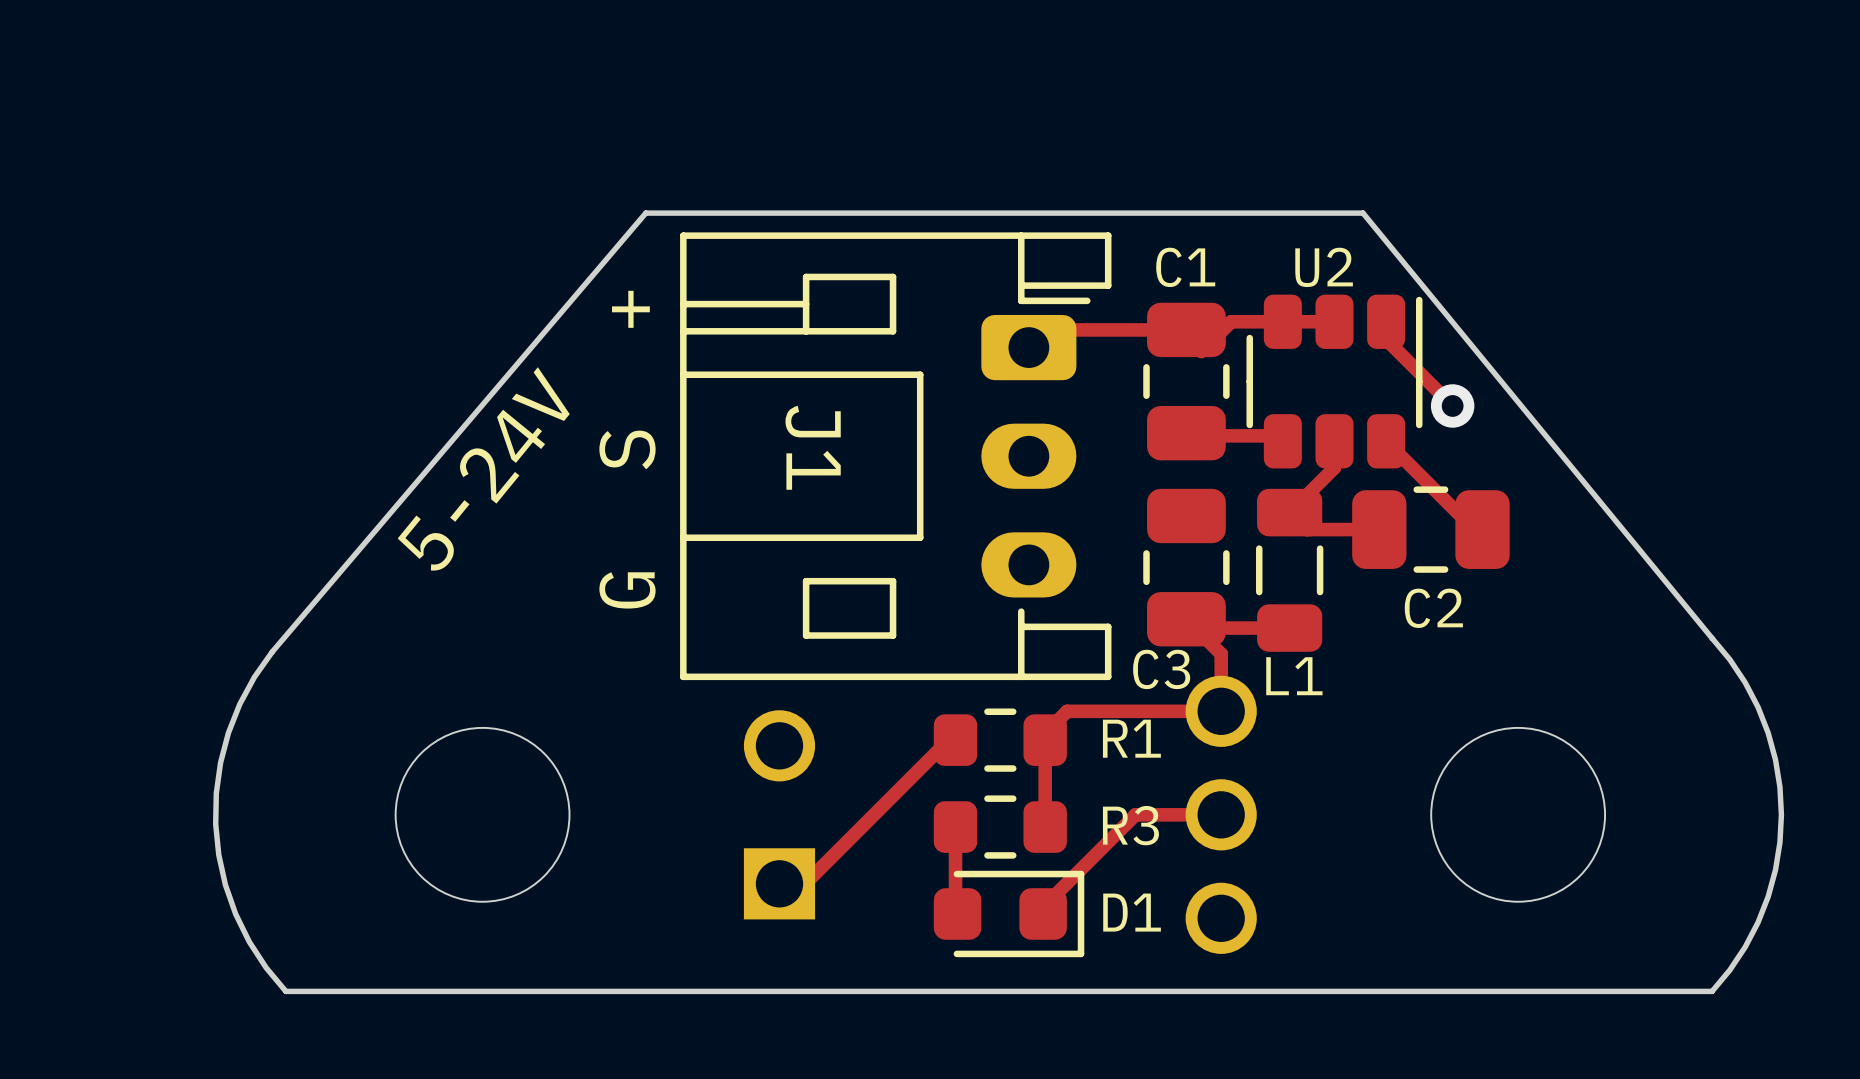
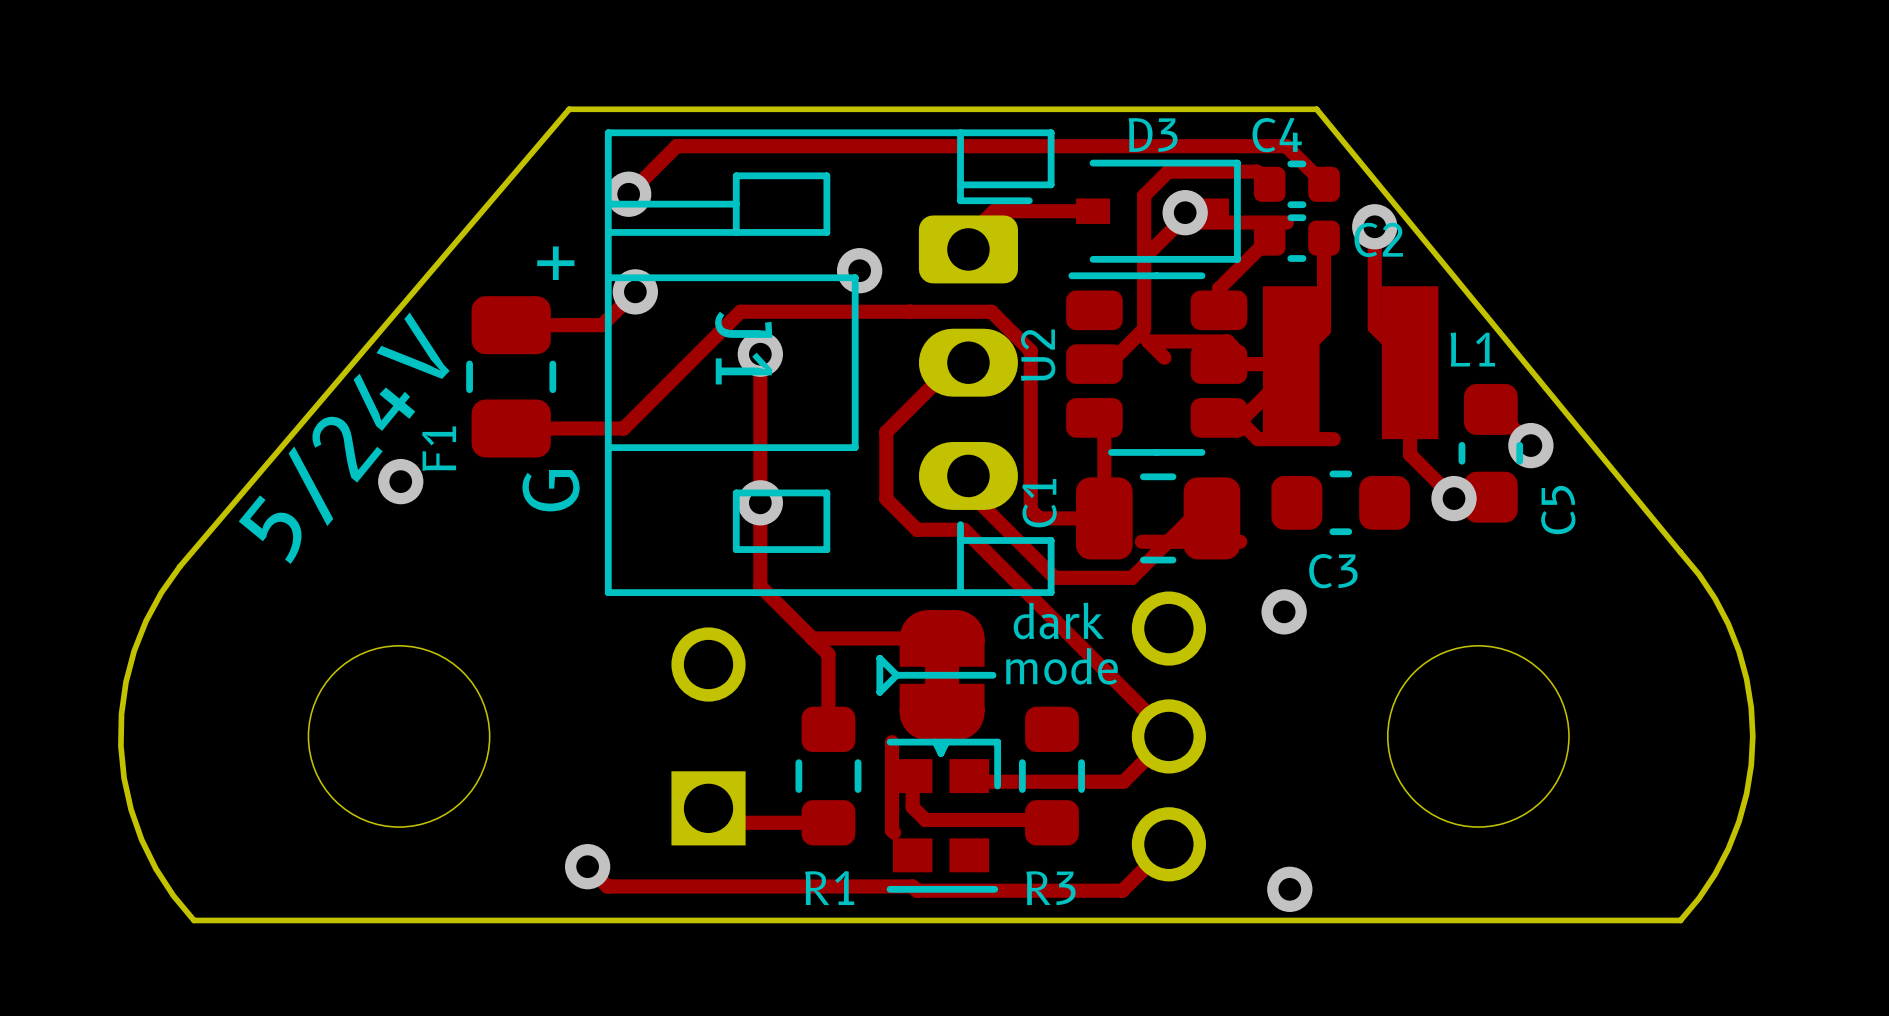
C1 name position: C1 (1185, 267) -> C1 (1039, 503)
track: none -> (1324, 183) (1286, 146) (676, 146) (628, 194)
track: none -> (1269, 184) (1257, 171) (1168, 171) (1144, 195) (1144, 328) (1108, 364) (1094, 364)
C4: none -> (1296, 184)
via: none -> (628, 194)
track: none -> (1093, 211) (993, 211) (954, 250)
D3: none -> (1158, 211)
via: none -> (1185, 212)
track: (1386, 321) (1386, 339) (1452, 405) -> none
track: none -> (1374, 226) (1374, 327) (1410, 362) (1410, 454) (1454, 498)
via: none -> (1374, 226)
track: (1186, 329) (1049, 329) (1027, 351) -> none
track: none -> (1269, 238) (1219, 288) (1219, 310)
track: none -> (1324, 238) (1324, 329) (1289, 364) (1219, 364)
via: none -> (859, 270)
C1 rotation: 0° (1186, 381) -> 90° clockwise (1158, 518)
C1 position: (1186, 381) -> (1158, 518)
U2 rotation: 0° (1334, 381) -> 90° counterclockwise (1156, 364)
U2 position: (1334, 381) -> (1156, 364)
track: none -> (635, 291) (602, 325) (511, 325)
via: none -> (635, 291)
via: (1452, 405) -> none
track: (1386, 441) (1474, 529) (1482, 529) -> none
track: none -> (760, 354) (760, 586) (828, 654) (828, 729)
via: none -> (760, 354)
text: G S + (627, 449) -> G + (551, 378)
track: none -> (954, 364) (886, 432) (886, 499) (917, 529) (964, 529) (1168, 734) (1123, 781) (969, 781)
text: 5-24V (483, 468) -> 5/24V (344, 438)
F1: none -> (511, 376)
C2 footprint: [1352, 486, 1510, 573] -> [1253, 214, 1340, 262]
C3 footprint: [1143, 488, 1230, 647] -> [1271, 470, 1411, 536]
L1 footprint: [1255, 488, 1324, 652] -> [1262, 286, 1439, 440]
track: none -> (1094, 417) (1104, 427) (1104, 518) (1039, 518) (1030, 509) (1030, 350) (991, 311) (740, 311) (623, 428) (511, 428)
via: none -> (1530, 445)
C5: none -> (1490, 453)
track: none -> (954, 477) (1054, 577) (1131, 577) (1191, 518) (1211, 518)
via: none -> (400, 481)
via: none -> (1454, 498)
via: none -> (760, 502)
C2 name position: C2 (1433, 608) -> C2 (1378, 239)
track: (1186, 619) (1221, 654) (1221, 711) (1067, 711) (1045, 733) (1045, 820) -> none
L1 name position: L1 (1294, 676) -> L1 (1472, 349)
via: none -> (1284, 611)
track: none -> (812, 638) (942, 638)
track: (955, 733) (805, 883) (779, 883) -> (828, 822) (722, 822) (708, 808)
R1 rotation: 0° (1000, 740) -> 90° clockwise (828, 776)
R1 position: (1000, 740) -> (828, 776)
part: none -> (936, 675)
track: (1221, 814) (1135, 814) (1043, 907) -> none
R3 rotation: 0° (1000, 827) -> 90° clockwise (1051, 776)
R3 position: (1000, 827) -> (1051, 776)
track: none -> (912, 776) (912, 807) (925, 819) (1049, 819) (1051, 822)
part: none -> (943, 815)
D1: (1009, 913) -> none
track: none -> (1168, 844) (1122, 890) (916, 890) (912, 886) (607, 886) (587, 866)
via: none -> (587, 866)
via: none -> (1289, 889)

